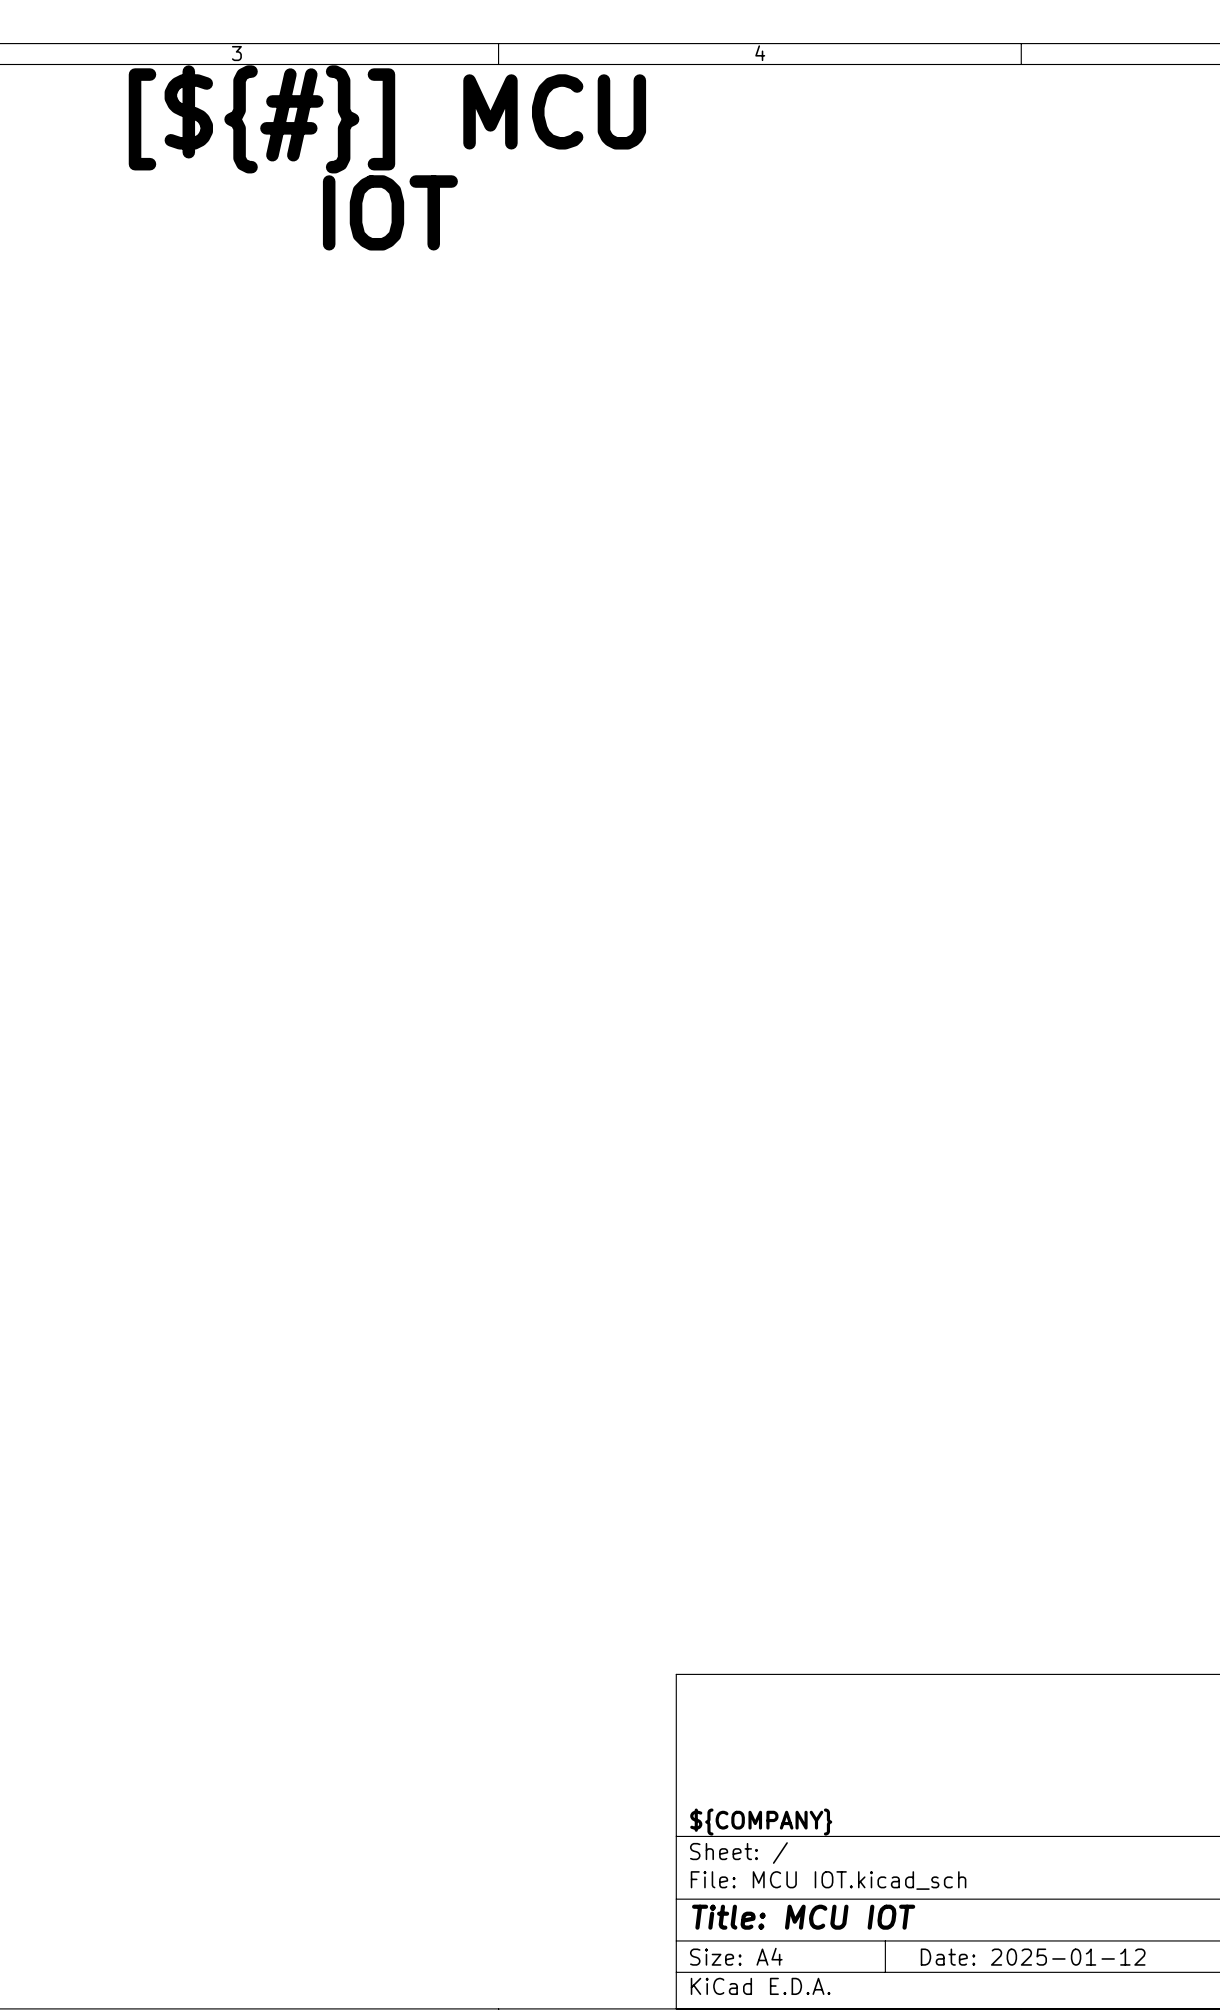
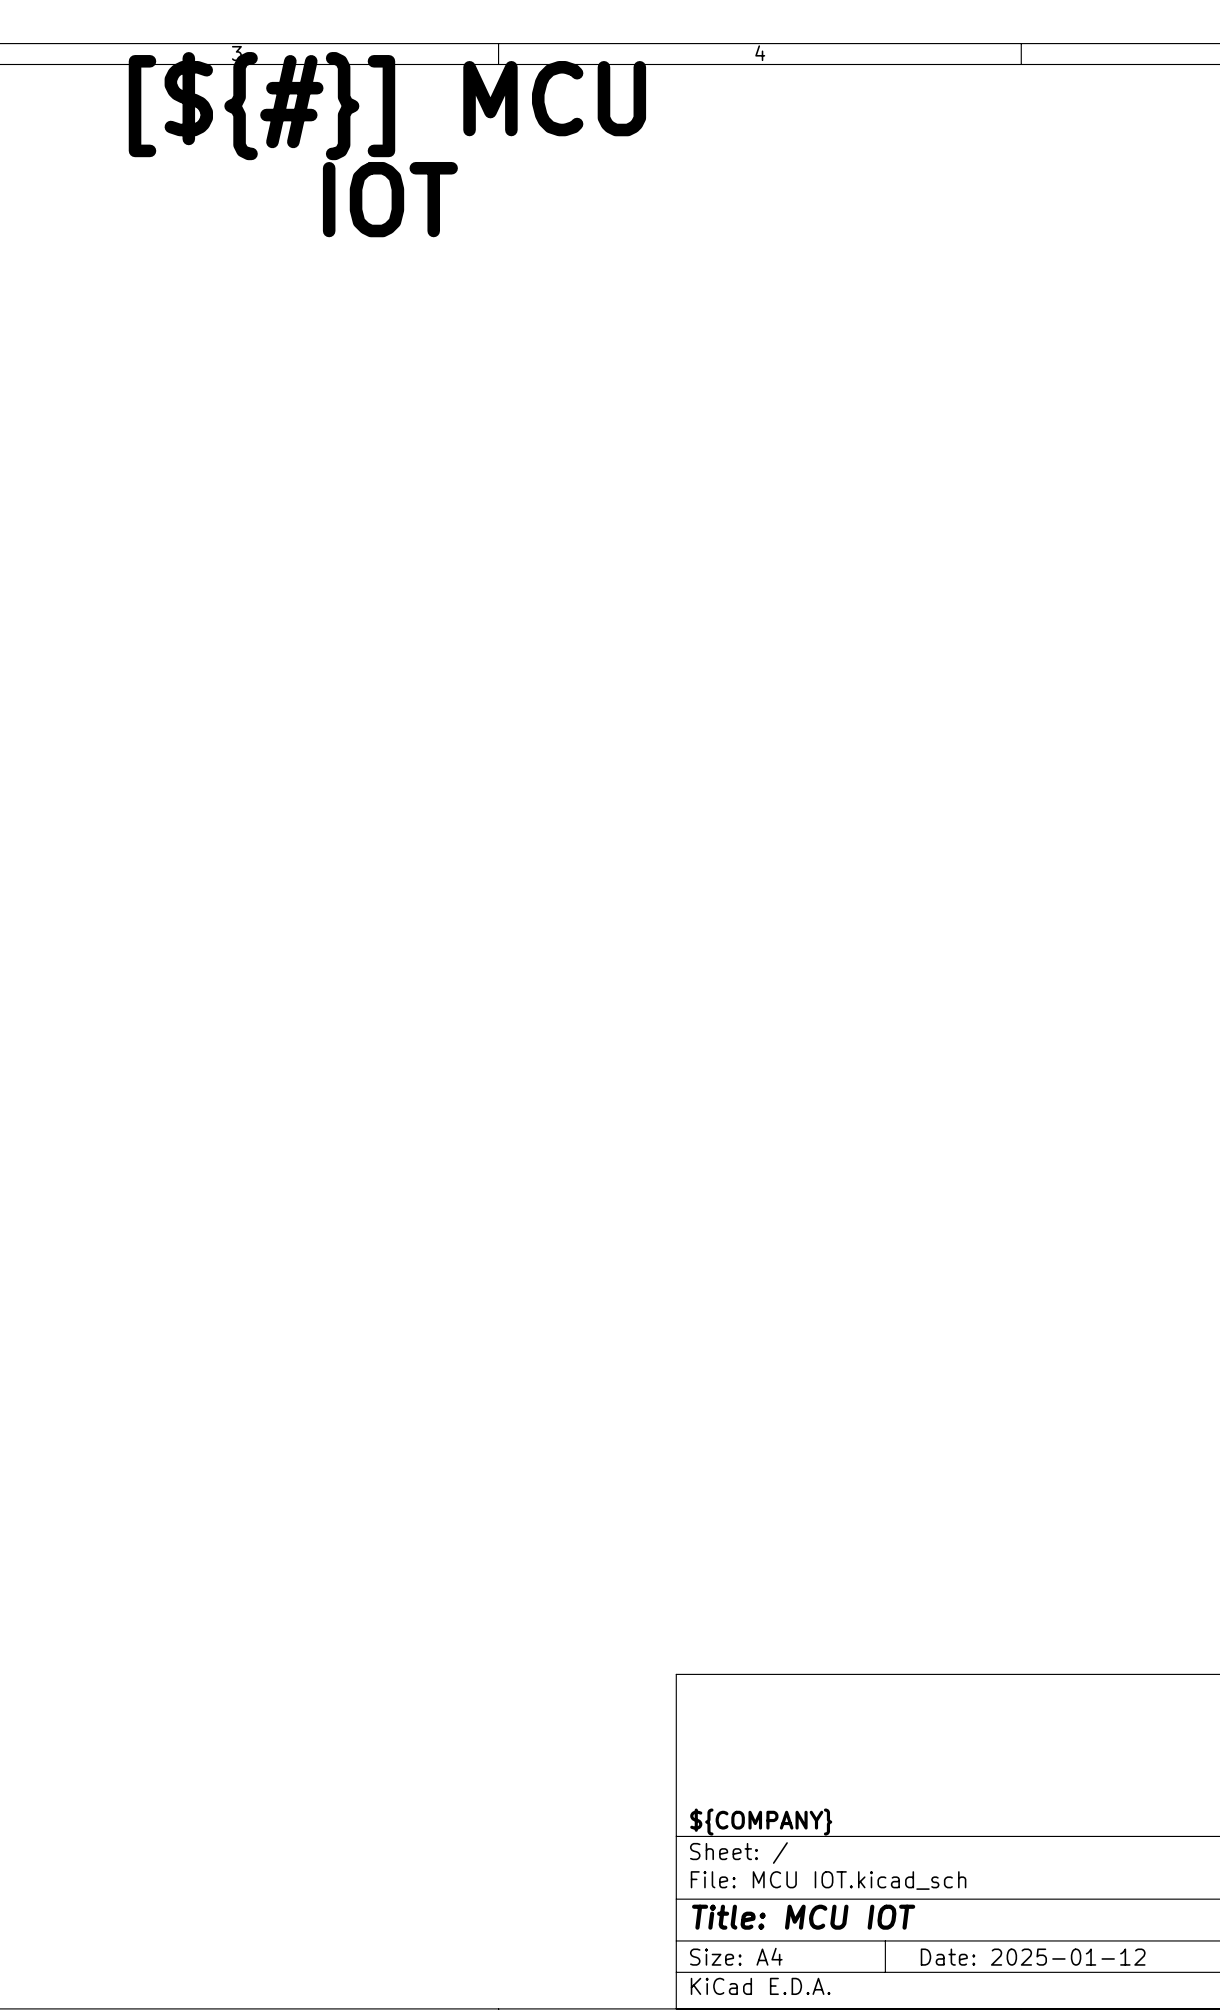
text position: [${#}] MCU (387, 119) -> [${#}] MCU (387, 106)
text position: IOT (390, 212) -> IOT (390, 199)

